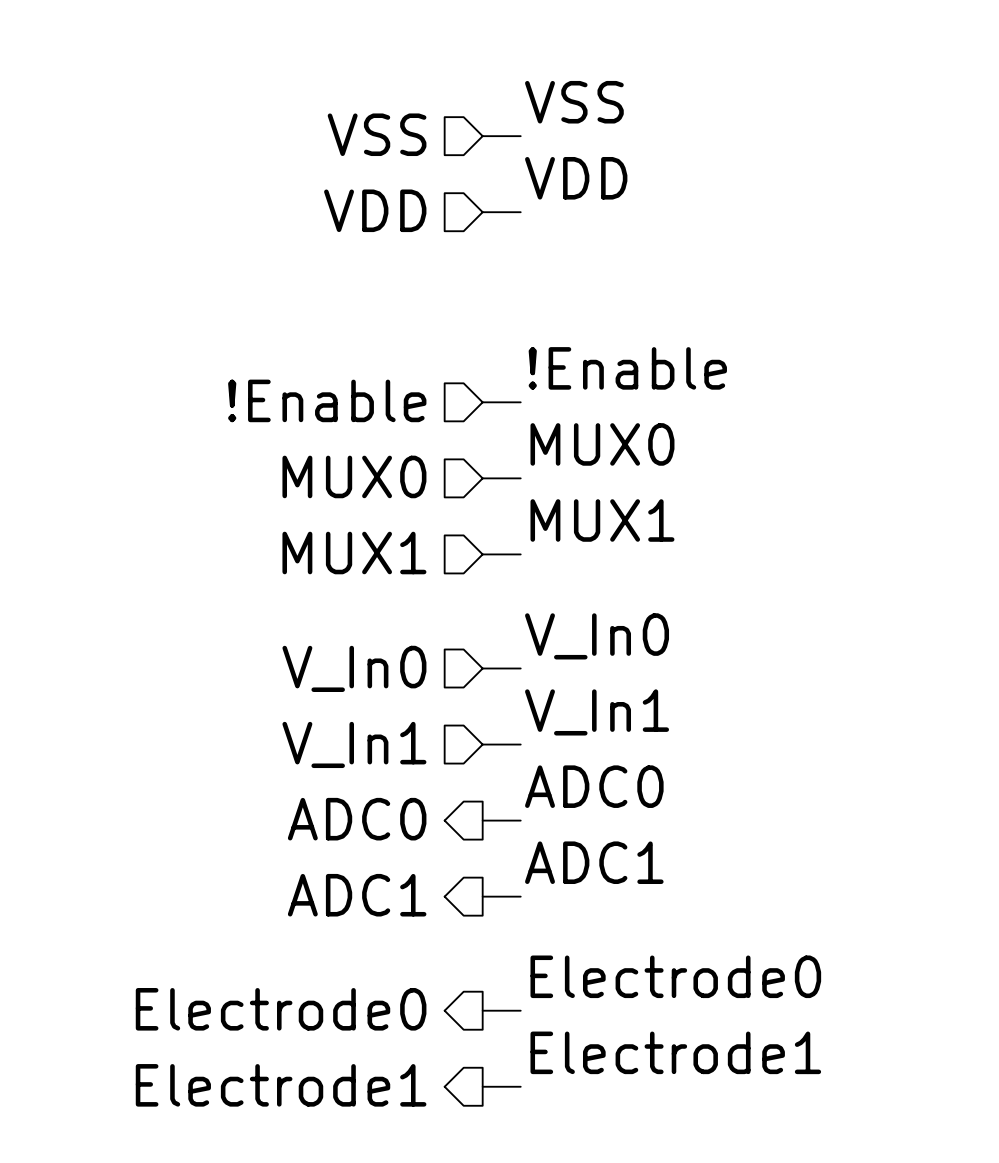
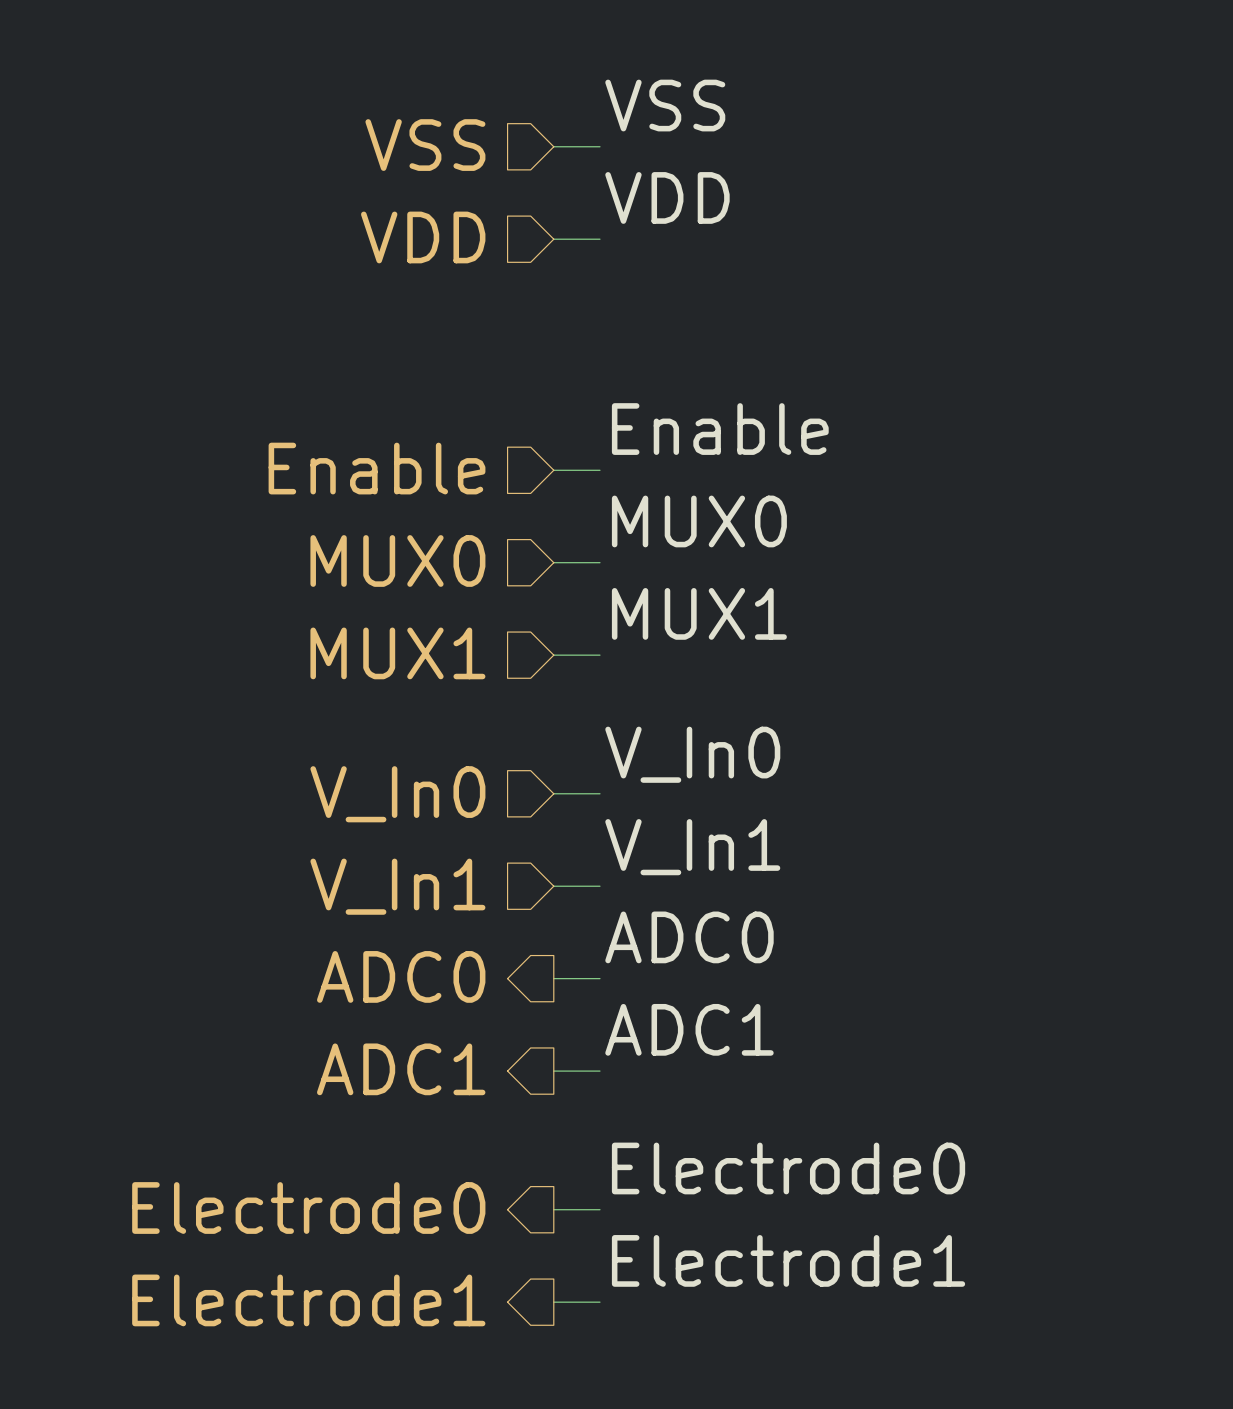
label: !Enable (627, 368) -> Enable (720, 429)
hierarchical label: !Enable (327, 400) -> Enable (377, 468)

